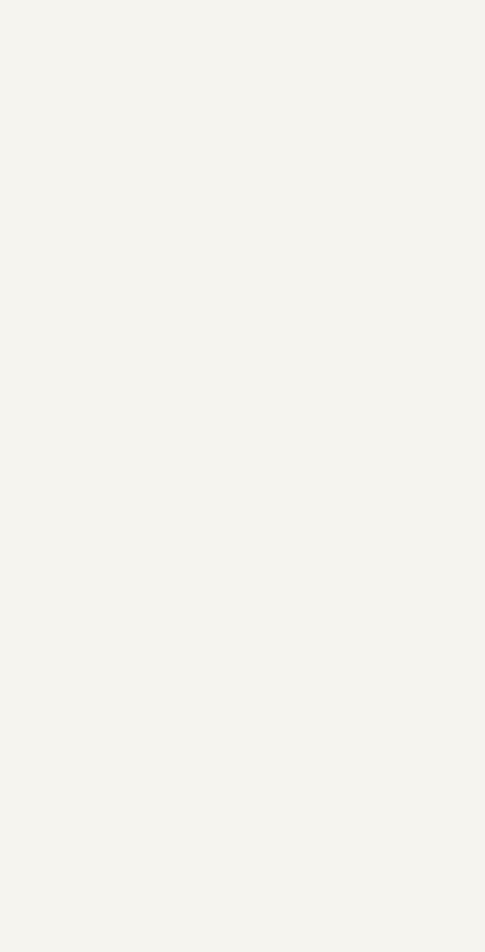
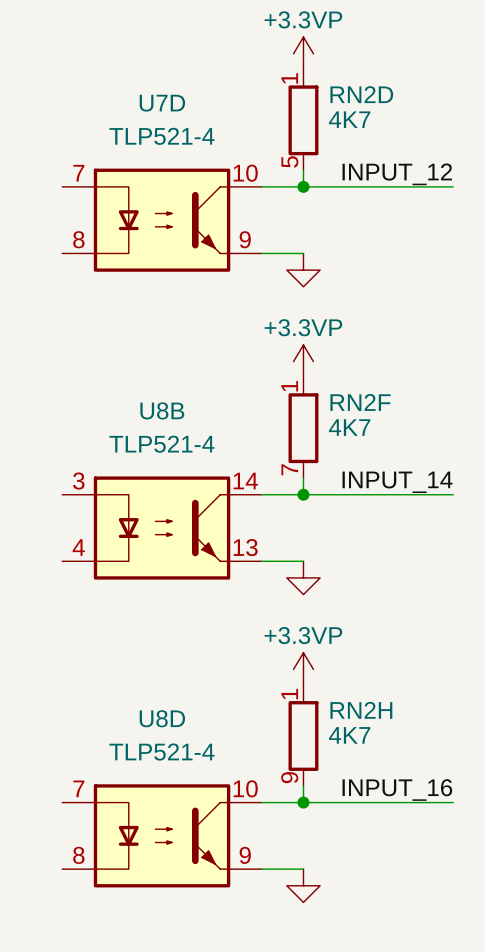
power symbol: none -> +3.3VP (303, 53)
RN2D: none -> 4K7 (303, 120)
wire: none -> (303, 170) (303, 186)
label: none -> INPUT_12 (397, 174)
wire: none -> (261, 186) (453, 186)
junction: none -> (303, 186)
U7D: none -> TLP521-4 (162, 220)
wire: none -> (261, 253) (303, 253)
power symbol: none -> (303, 270)
power symbol: none -> +3.3VP (303, 361)
RN2F: none -> 4K7 (303, 428)
wire: none -> (303, 478) (303, 494)
label: none -> INPUT_14 (397, 482)
wire: none -> (261, 494) (453, 494)
junction: none -> (303, 494)
U8B: none -> TLP521-4 (162, 528)
wire: none -> (261, 561) (303, 561)
power symbol: none -> (303, 577)
power symbol: none -> +3.3VP (303, 669)
RN2H: none -> 4K7 (303, 736)
wire: none -> (303, 785) (303, 802)
label: none -> INPUT_16 (397, 790)
wire: none -> (261, 802) (453, 802)
junction: none -> (303, 802)
U8D: none -> TLP521-4 (162, 835)
wire: none -> (261, 869) (303, 869)
power symbol: none -> (303, 885)

